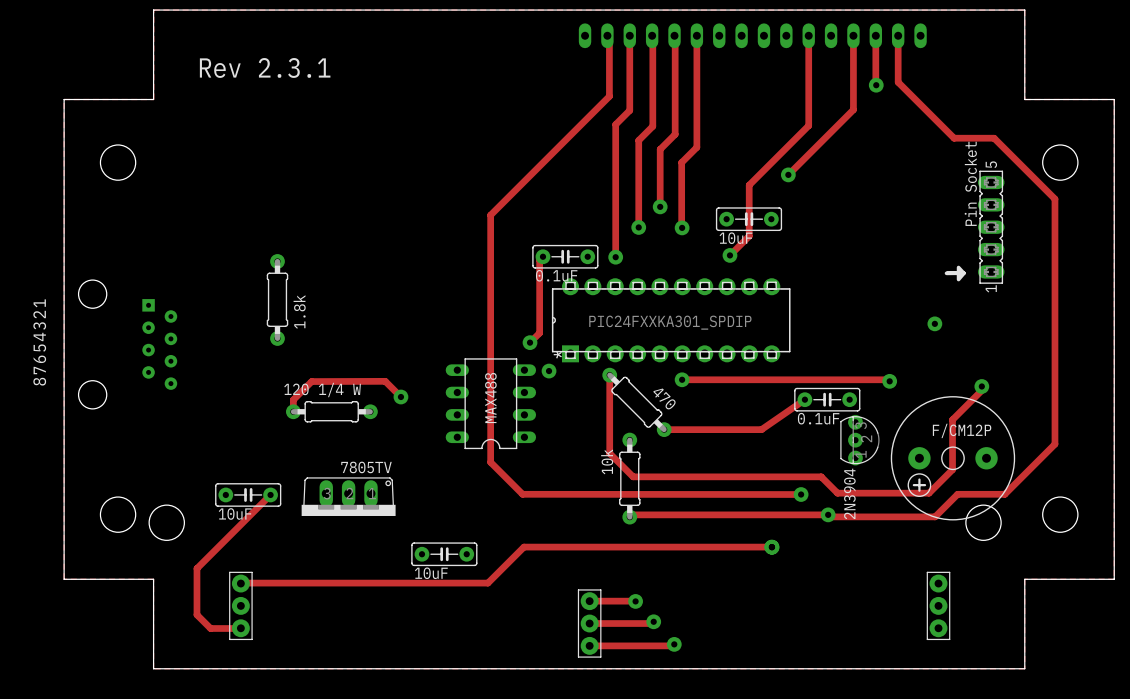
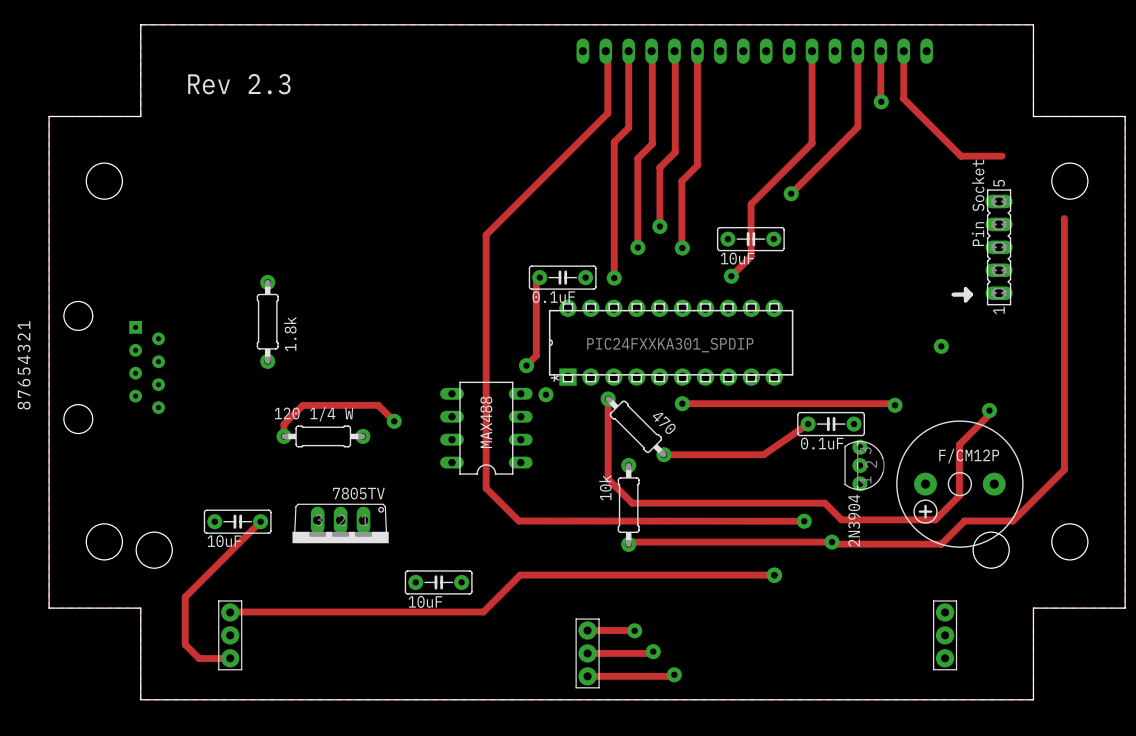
text: Rev 2.3.1 (265, 67) -> Rev 2.3 (239, 84)
track: (994, 138) (1054, 199) -> none

